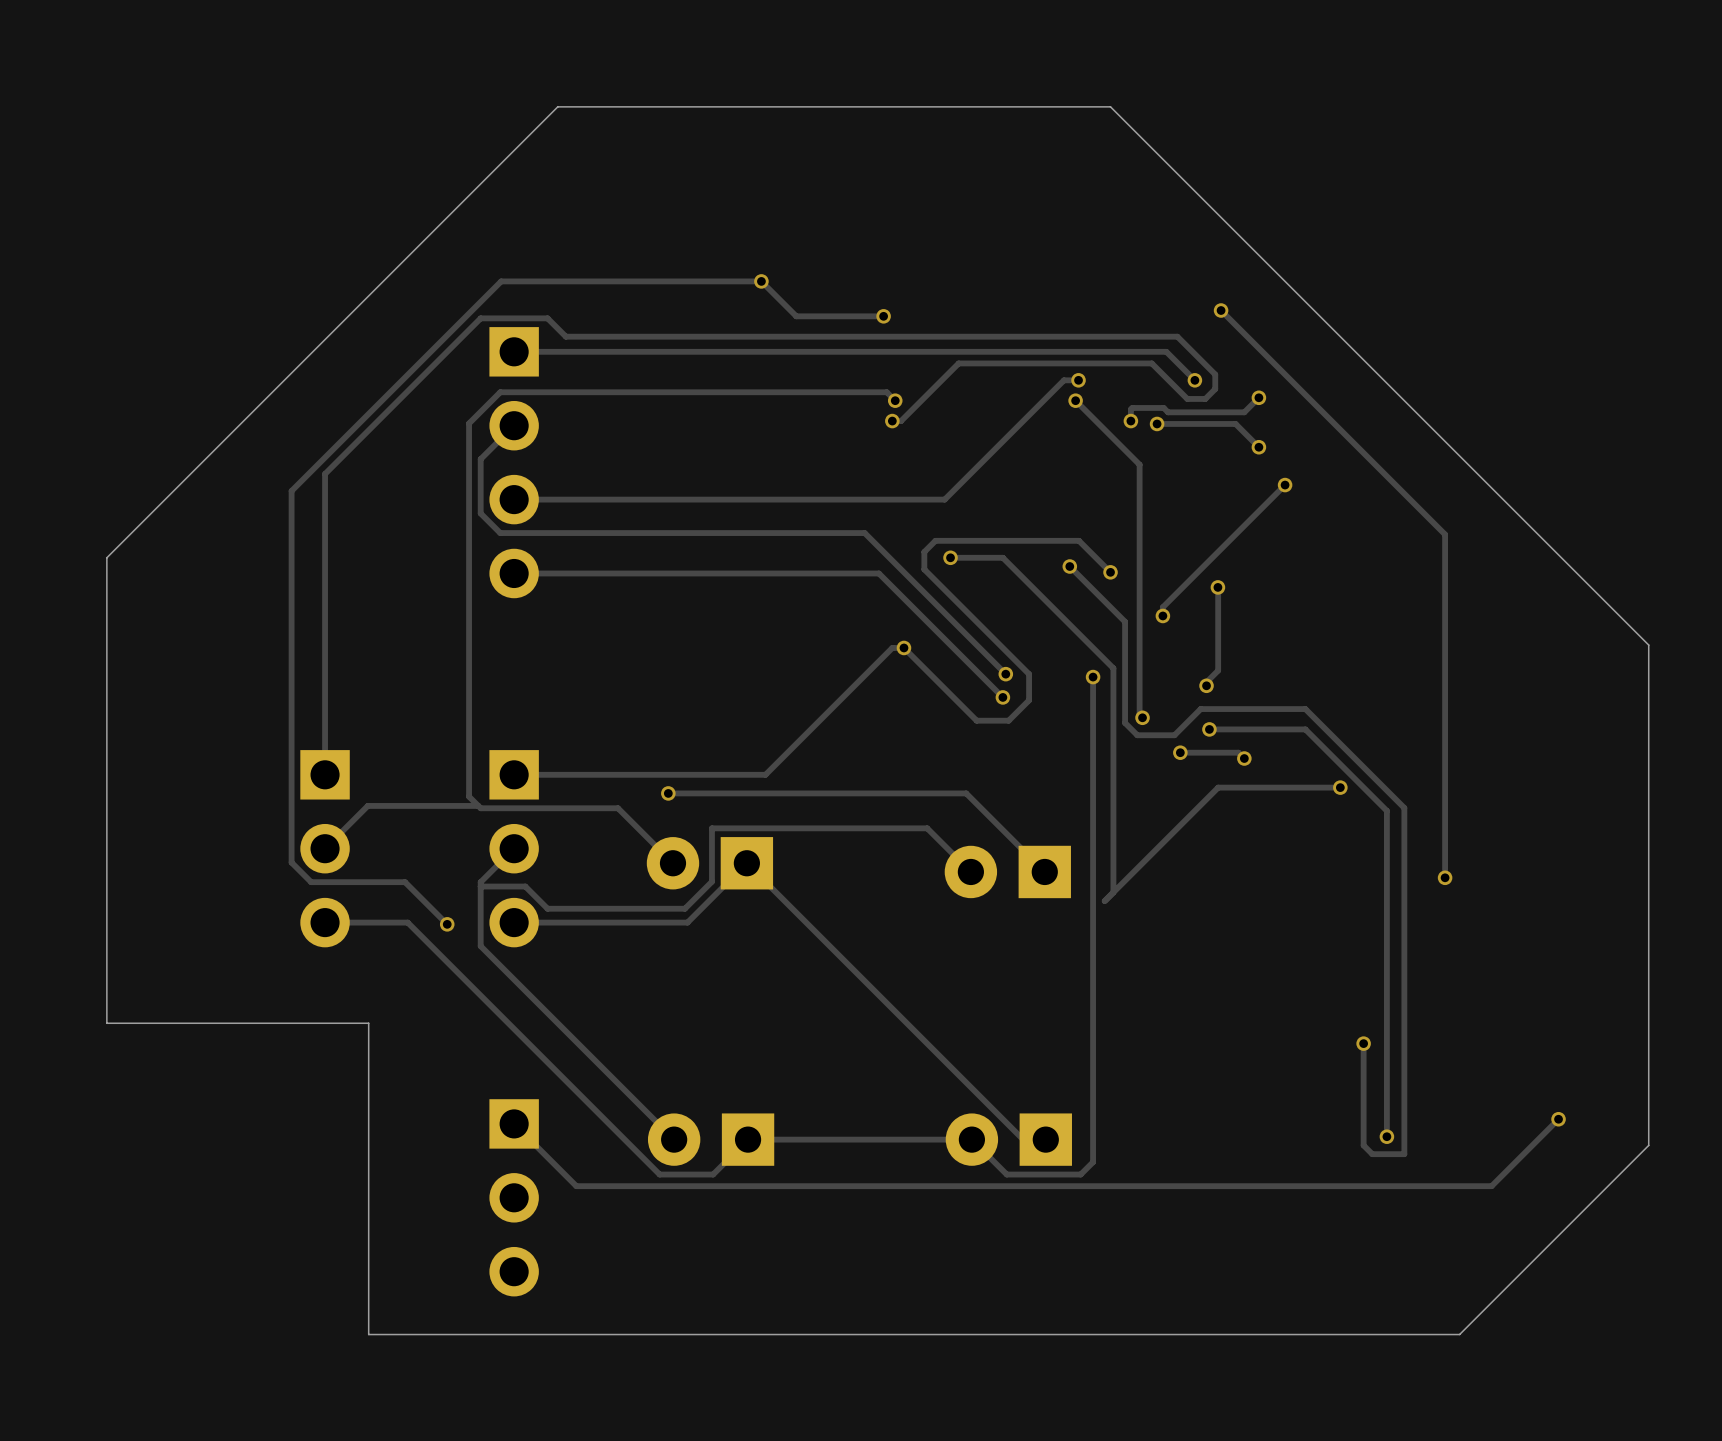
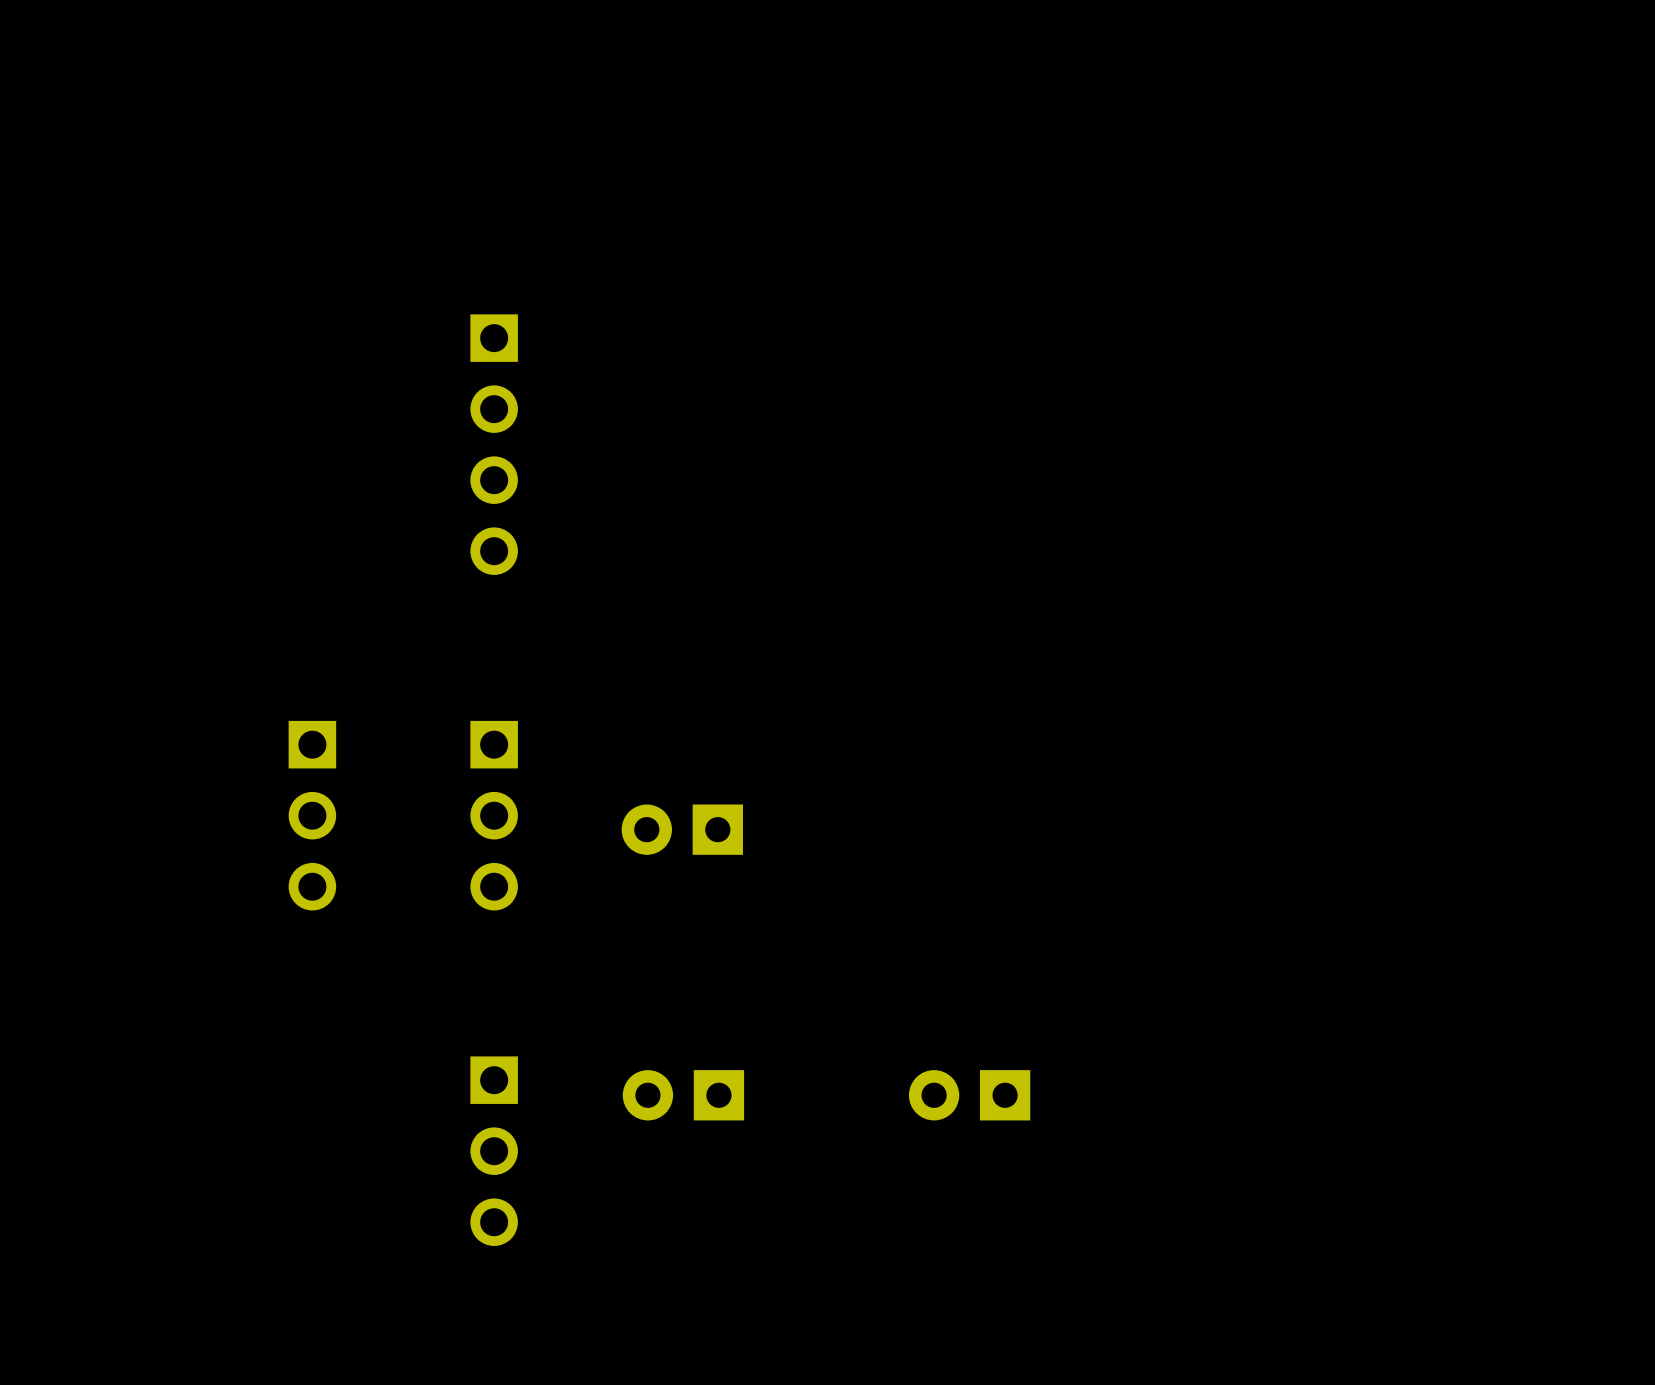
board edge: (1110, 106) (1648, 645) (1648, 1145) (1459, 1334) (368, 1334) (368, 1023) (106, 1023) (106, 557) (557, 106) (1110, 106) -> none
via: (761, 281) -> none
track: (1221, 310) (1445, 534) (1445, 877) -> none
via: (1221, 310) -> none
track: (883, 316) (796, 316) (761, 281) (501, 281) (291, 491) (291, 862) (311, 882) (405, 882) (447, 924) -> none
via: (883, 316) -> none
track: (514, 351) (1166, 351) (1194, 380) -> none
track: (1078, 380) (1063, 380) (944, 499) (514, 499) -> none
via: (1078, 380) -> none
via: (1194, 380) -> none
track: (1258, 397) (1244, 412) (1168, 412) (1163, 407) (1132, 407) (1130, 421) -> none
via: (1258, 397) -> none
track: (895, 400) (886, 392) (500, 392) (469, 423) (469, 796) (480, 808) (618, 808) (672, 863) -> none
via: (895, 400) -> none
track: (1075, 400) (1139, 464) (1139, 714) (1142, 717) -> none
via: (1075, 400) -> none
track: (892, 421) (901, 421) (958, 363) (1151, 363) (1187, 398) (1205, 398) (1215, 389) (1215, 374) (1177, 336) (565, 336) (547, 318) (480, 318) (325, 474) (325, 774) -> none
via: (892, 421) -> none
via: (1130, 421) -> none
track: (1157, 423) (1235, 423) (1258, 447) -> none
via: (1157, 423) -> none
track: (514, 425) (480, 459) (480, 513) (500, 533) (864, 533) (1005, 674) -> none
via: (1258, 447) -> none
track: (1285, 485) (1162, 607) (1162, 615) -> none
via: (1285, 485) -> none
track: (950, 557) (1002, 557) (1113, 668) (1113, 892) -> none
via: (950, 557) -> none
track: (1069, 566) (1125, 621) (1125, 722) (1137, 735) (1174, 735) (1200, 709) (1305, 709) (1404, 807) (1404, 1154) (1372, 1154) (1363, 1145) (1363, 1043) -> none
via: (1069, 566) -> none
track: (1110, 572) (1079, 540) (935, 540) (924, 551) (924, 569) (1029, 674) (1029, 700) (1008, 720) (976, 720) (903, 647) (892, 647) (765, 774) (514, 774) -> none
via: (1110, 572) -> none
track: (514, 573) (878, 573) (1002, 697) -> none
track: (1218, 586) (1218, 670) (1206, 682) (1206, 685) -> none
via: (1217, 587) -> none
via: (1162, 615) -> none
via: (903, 647) -> none
via: (1005, 674) -> none
track: (1093, 677) (1093, 1162) (1080, 1174) (1006, 1174) (971, 1139) (748, 1139) (713, 1174) (659, 1174) (407, 922) (325, 922) -> none
via: (1093, 677) -> none
via: (1206, 685) -> none
via: (1002, 697) -> none
via: (1142, 717) -> none
track: (1209, 729) (1305, 729) (1386, 810) (1386, 1136) -> none
via: (1209, 729) -> none
track: (1180, 752) (1238, 752) (1244, 758) -> none
via: (1180, 752) -> none
via: (1244, 758) -> none
track: (1340, 787) (1218, 787) (1104, 901) -> none
via: (1340, 787) -> none
track: (668, 793) (966, 793) (1044, 871) -> none
via: (668, 793) -> none
track: (478, 805) (367, 805) (325, 848) -> none
track: (514, 848) (480, 882) (480, 946) (674, 1139) -> none
track: (970, 871) (927, 828) (711, 828) (711, 881) (684, 908) (547, 908) (525, 886) (480, 886) -> none
part: (1007, 871) -> none
via: (1445, 877) -> none
track: (514, 922) (687, 922) (746, 863) (1023, 1139) (1045, 1139) -> none
via: (447, 924) -> none
via: (1363, 1043) -> none
track: (1558, 1119) (1491, 1186) (576, 1186) (514, 1123) -> none
via: (1558, 1119) -> none
via: (1386, 1136) -> none

